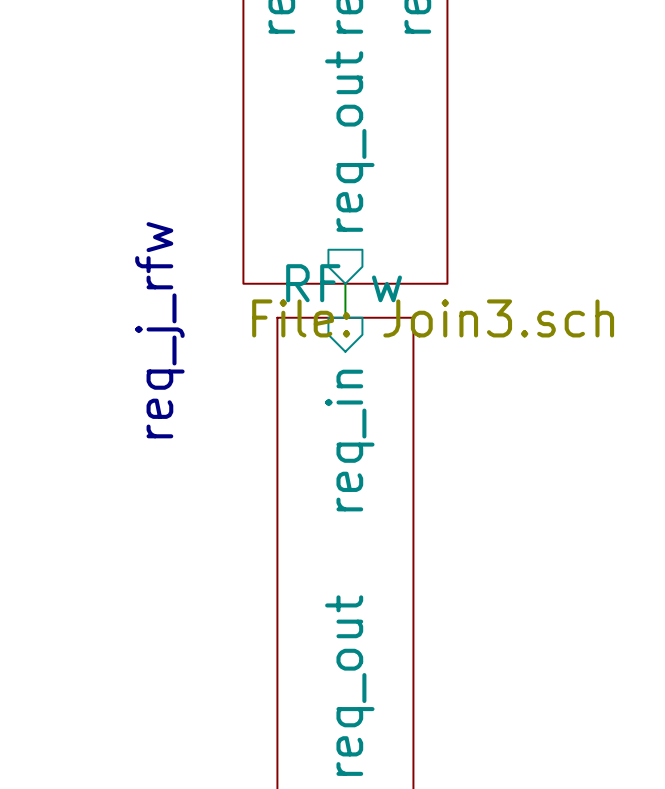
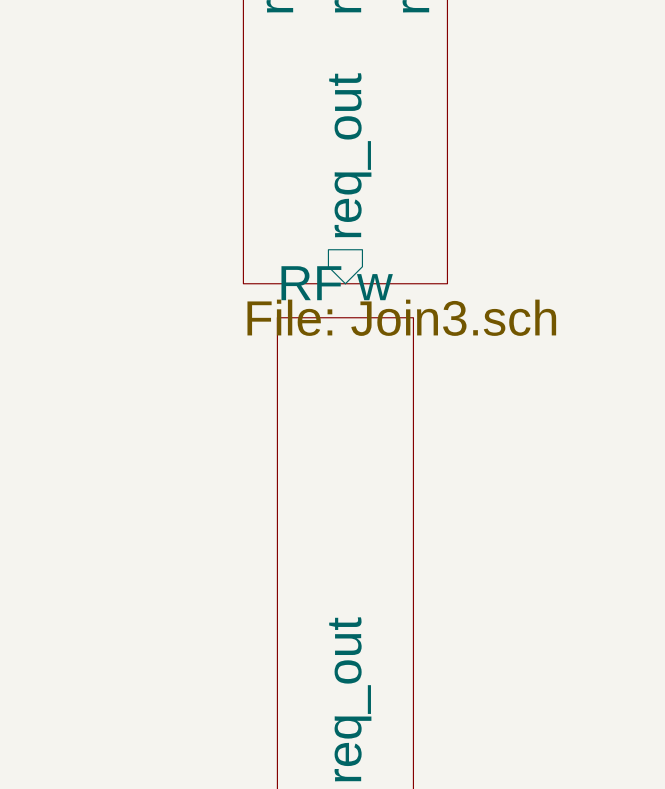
wire: (345, 283) (345, 317) -> none
text: req_j_rfw (159, 330) -> none
sheet pin: req_in (349, 440) -> none

